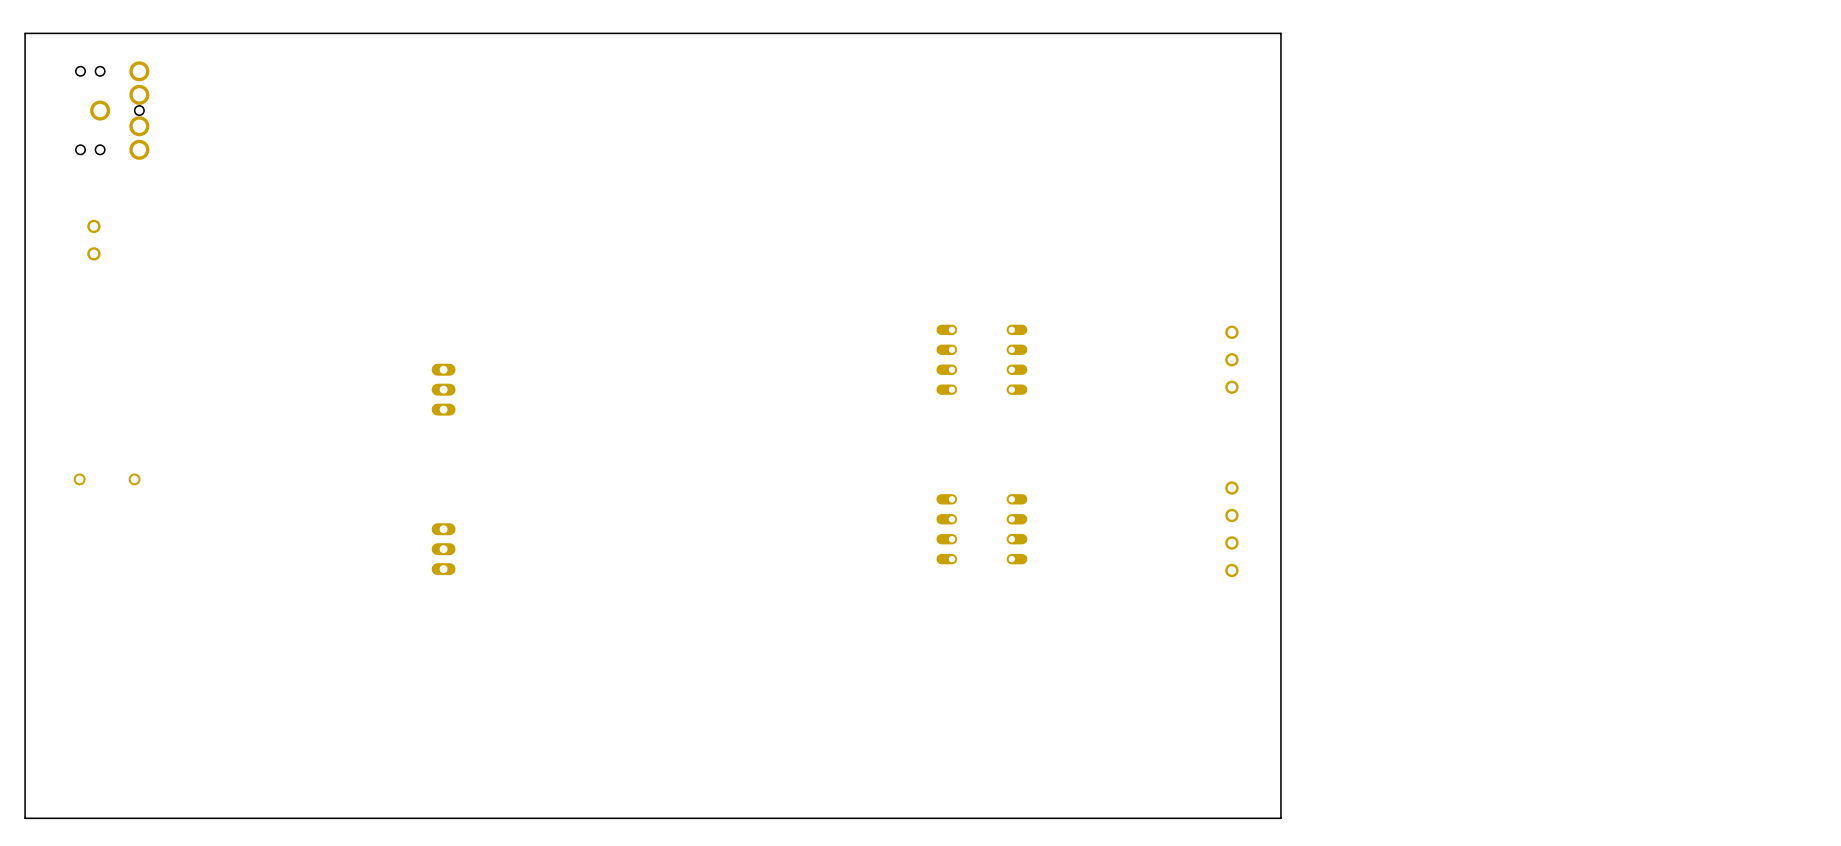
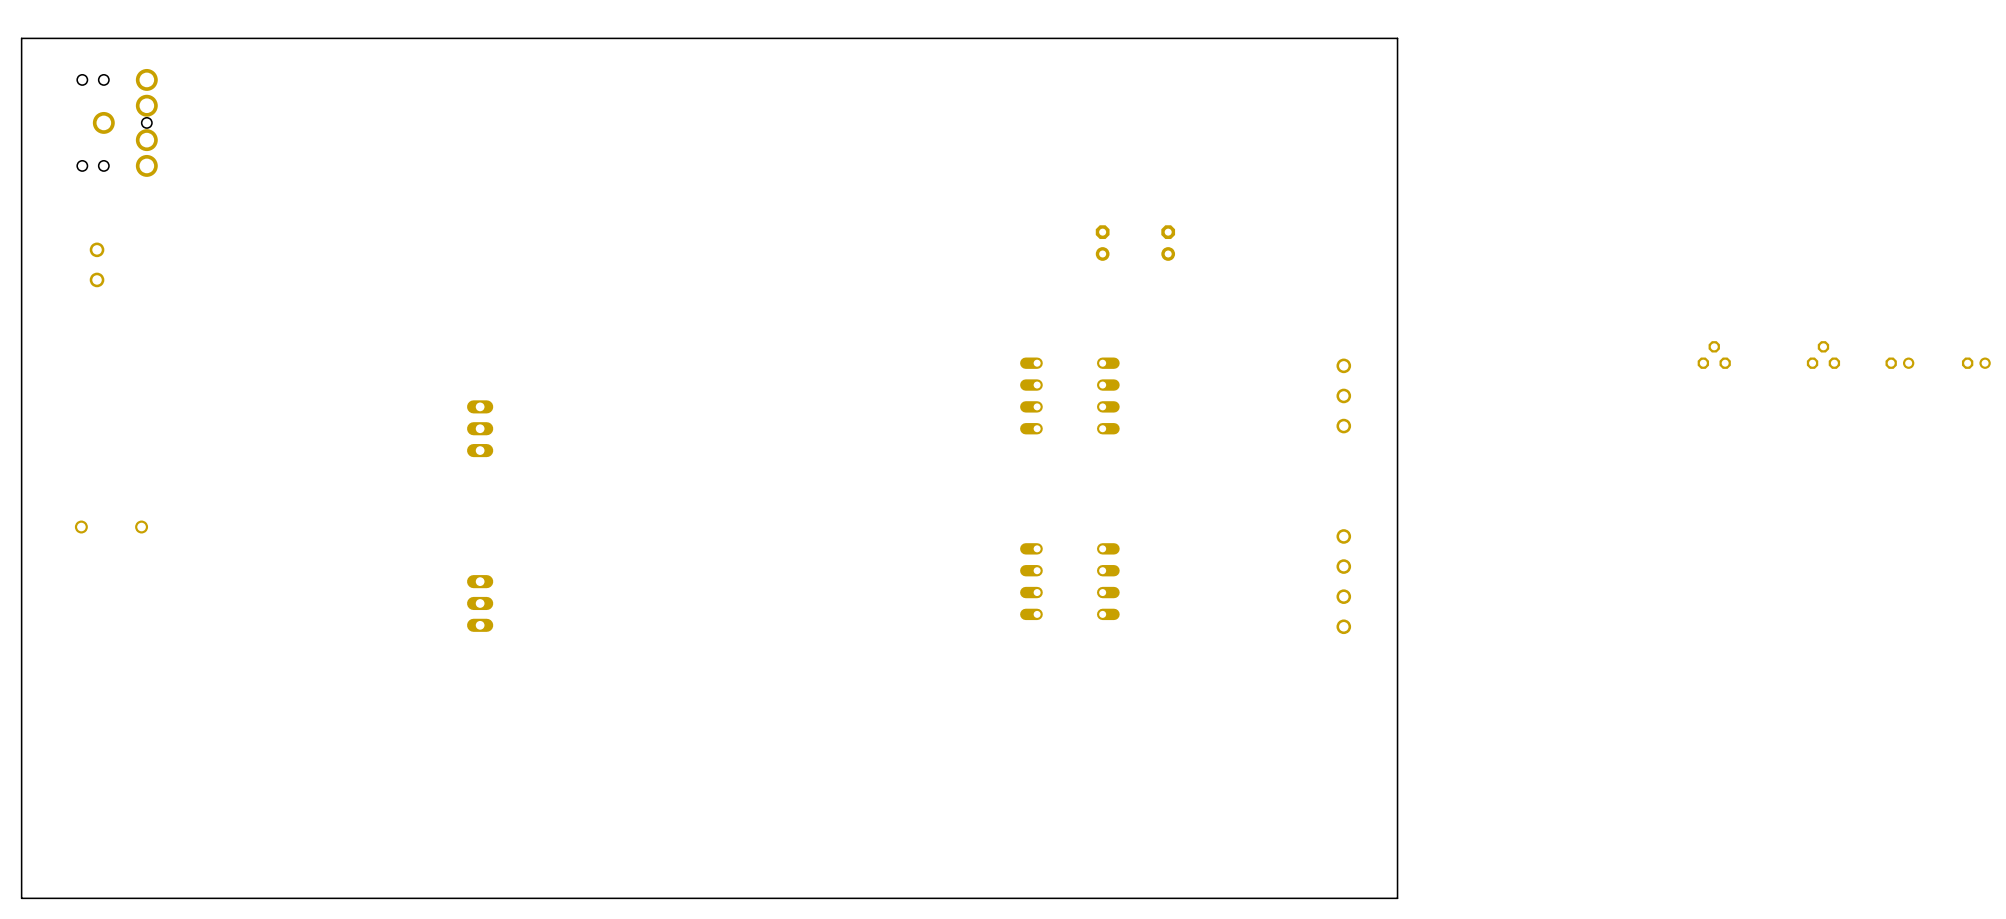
part: none -> (1102, 243)
part: none -> (1168, 243)
part: none -> (1714, 355)
part: none -> (1823, 355)
part: none -> (1899, 363)
part: none -> (1976, 363)

